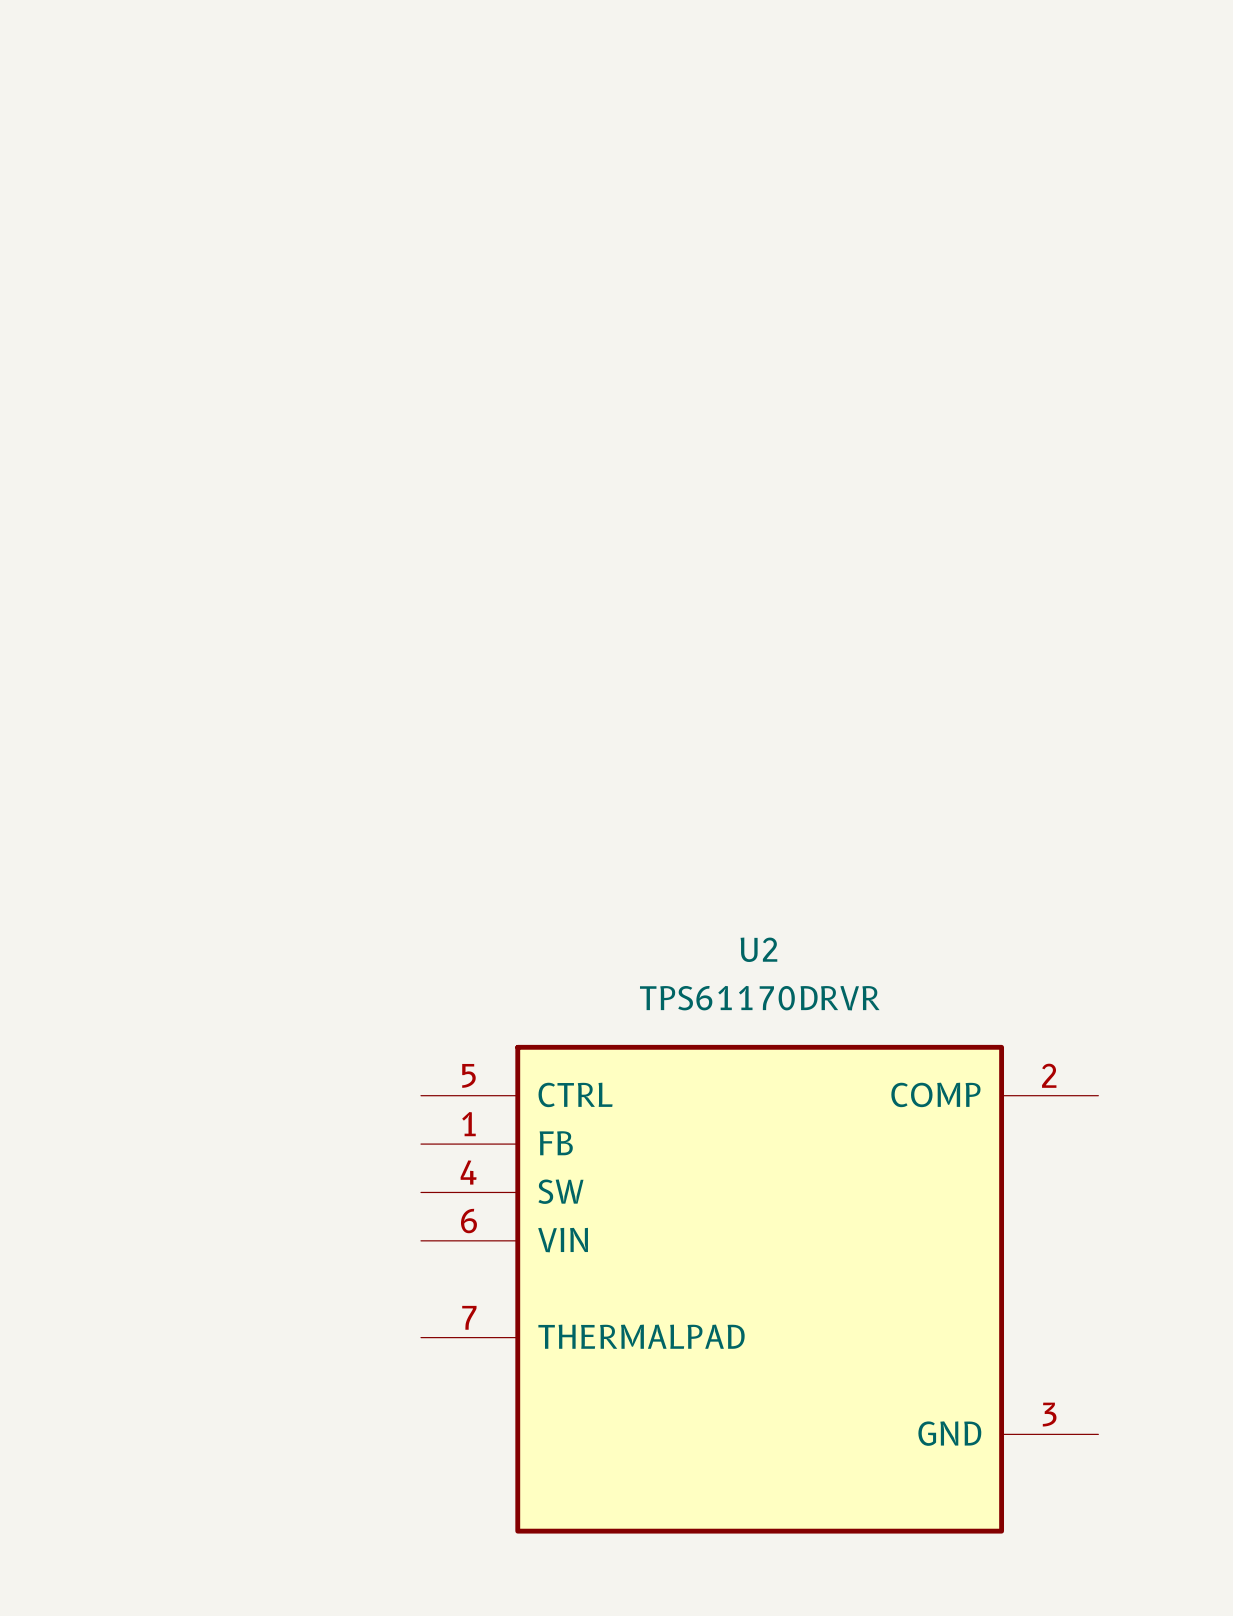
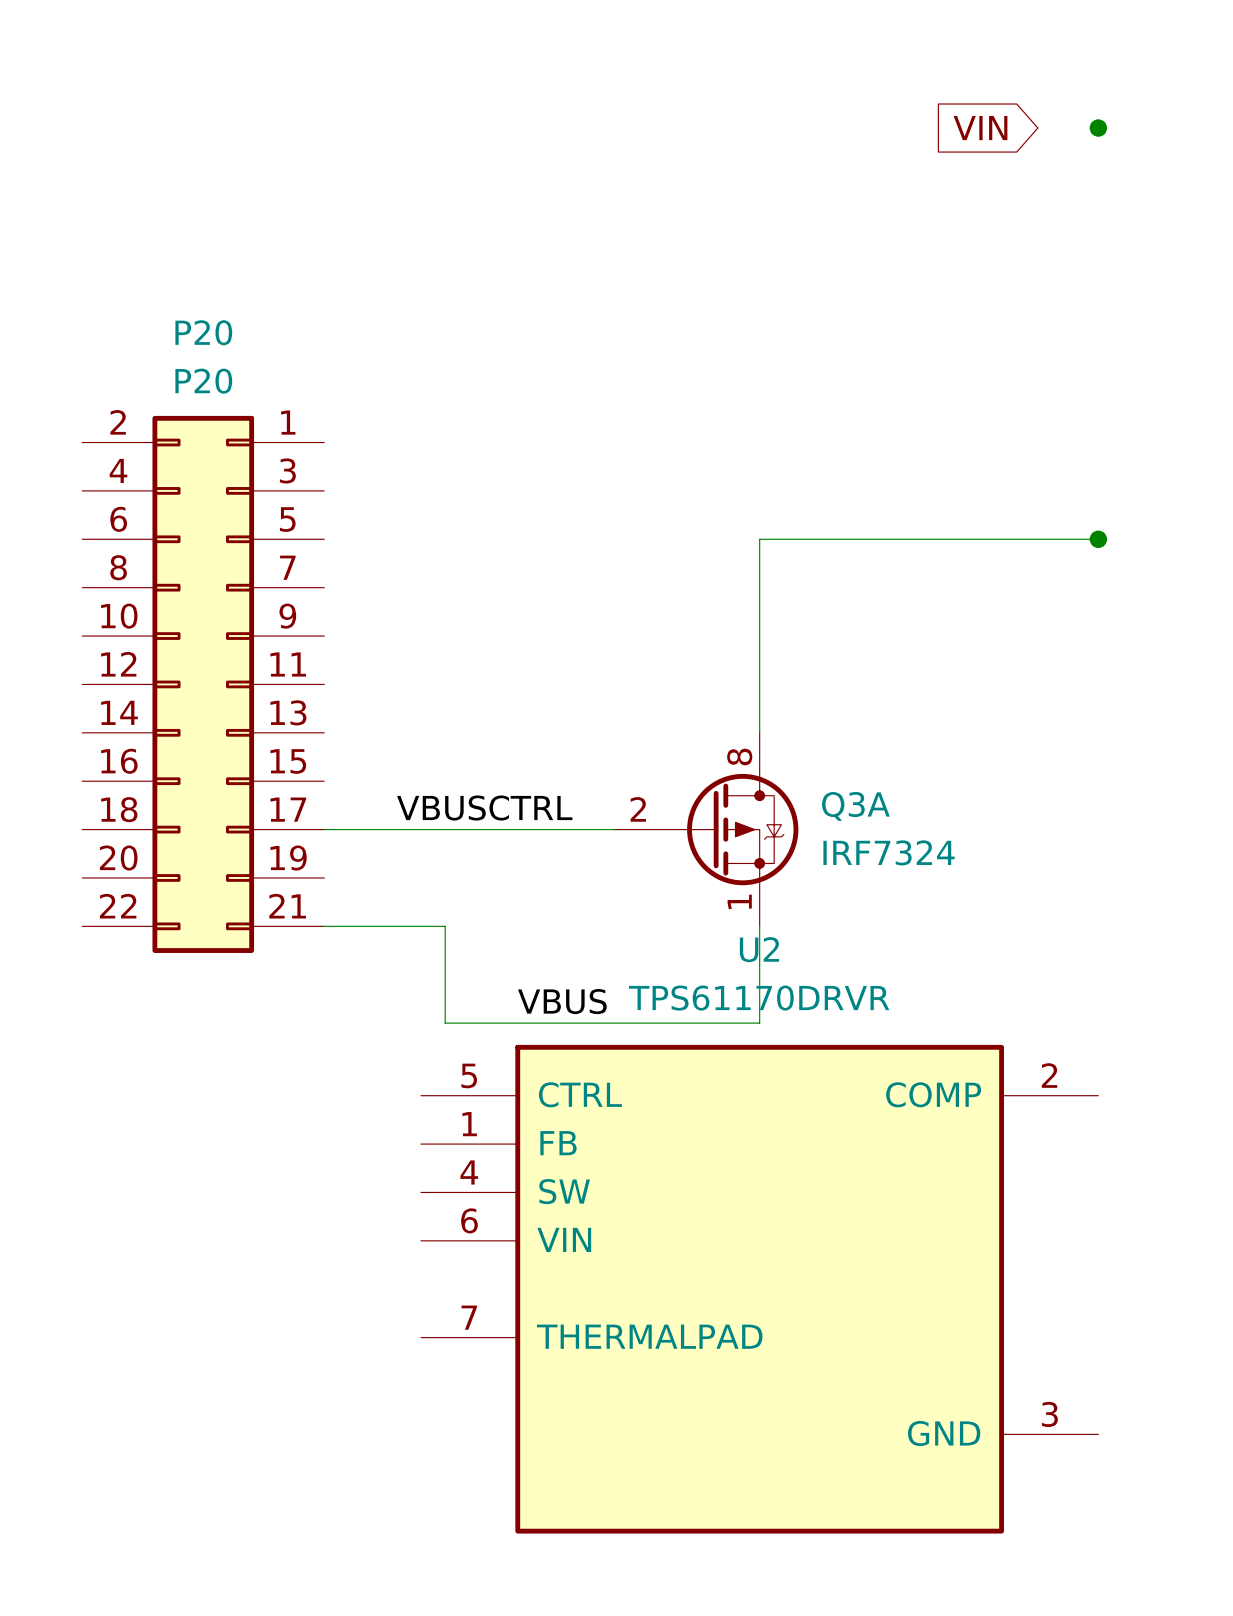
global label: none -> VIN (980, 128)
junction: none -> (1098, 128)
wire: none -> (1098, 539) (759, 539) (759, 732)
junction: none -> (1098, 539)
P20: none -> P20 (203, 684)
label: none -> VBUSCTRL (484, 808)
wire: none -> (324, 829) (614, 829)
Q3A: none -> IRF7324 (706, 829)
wire: none -> (324, 926) (445, 926) (445, 1023) (759, 1023) (759, 926)
label: none -> VBUS (562, 1001)

